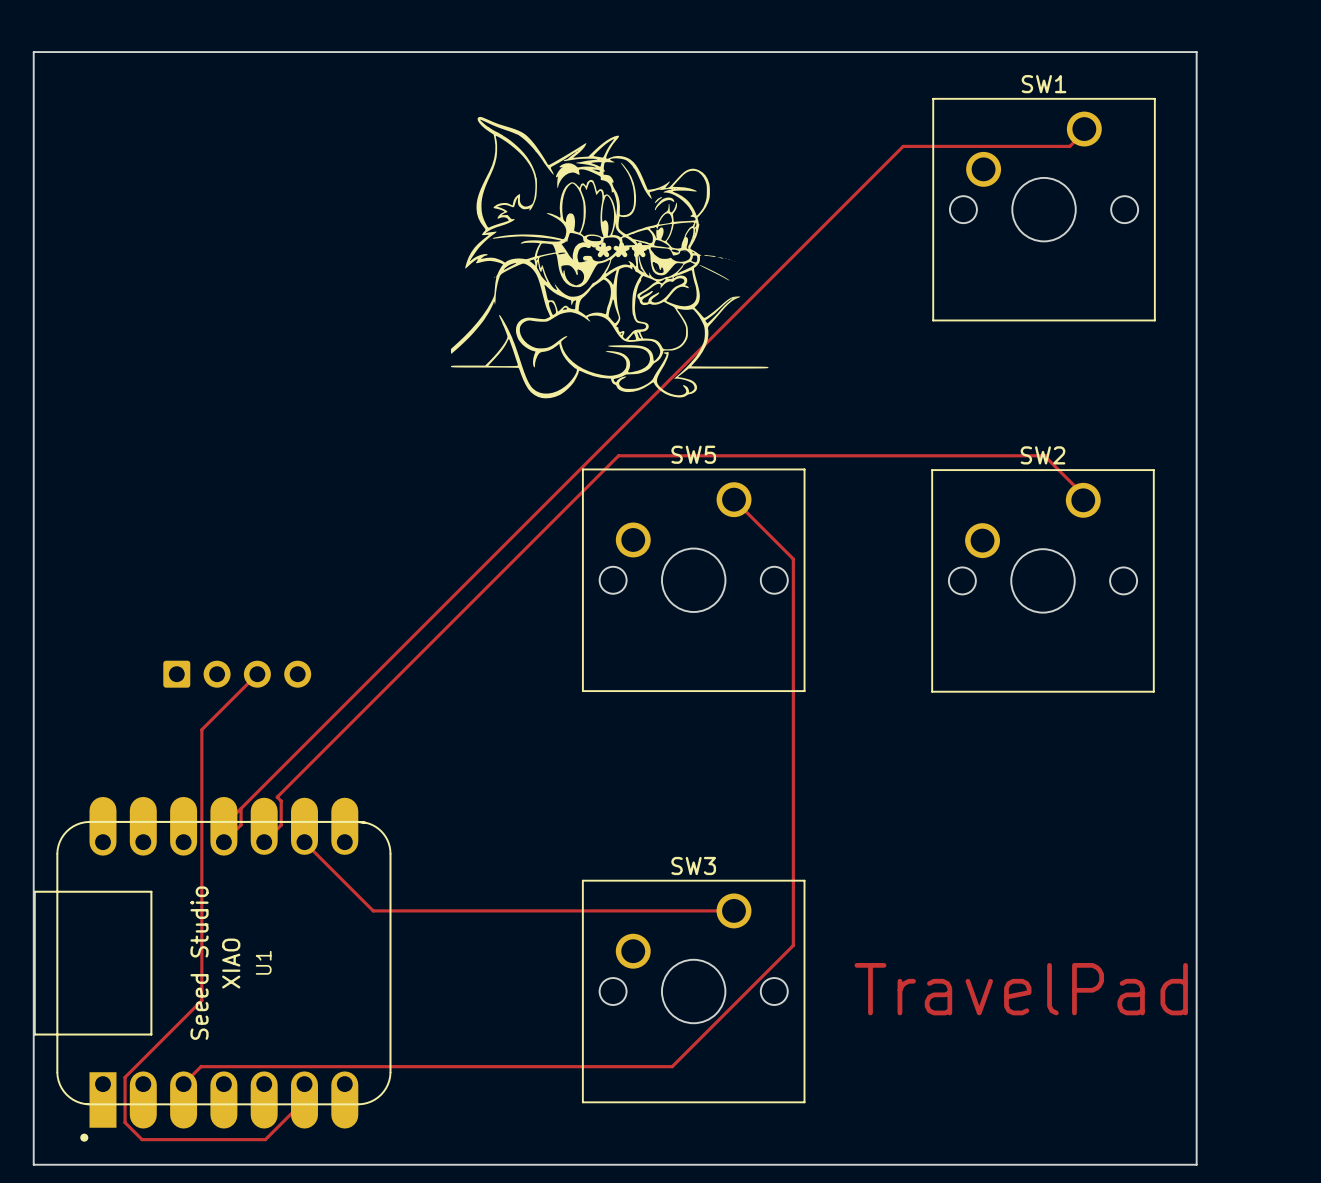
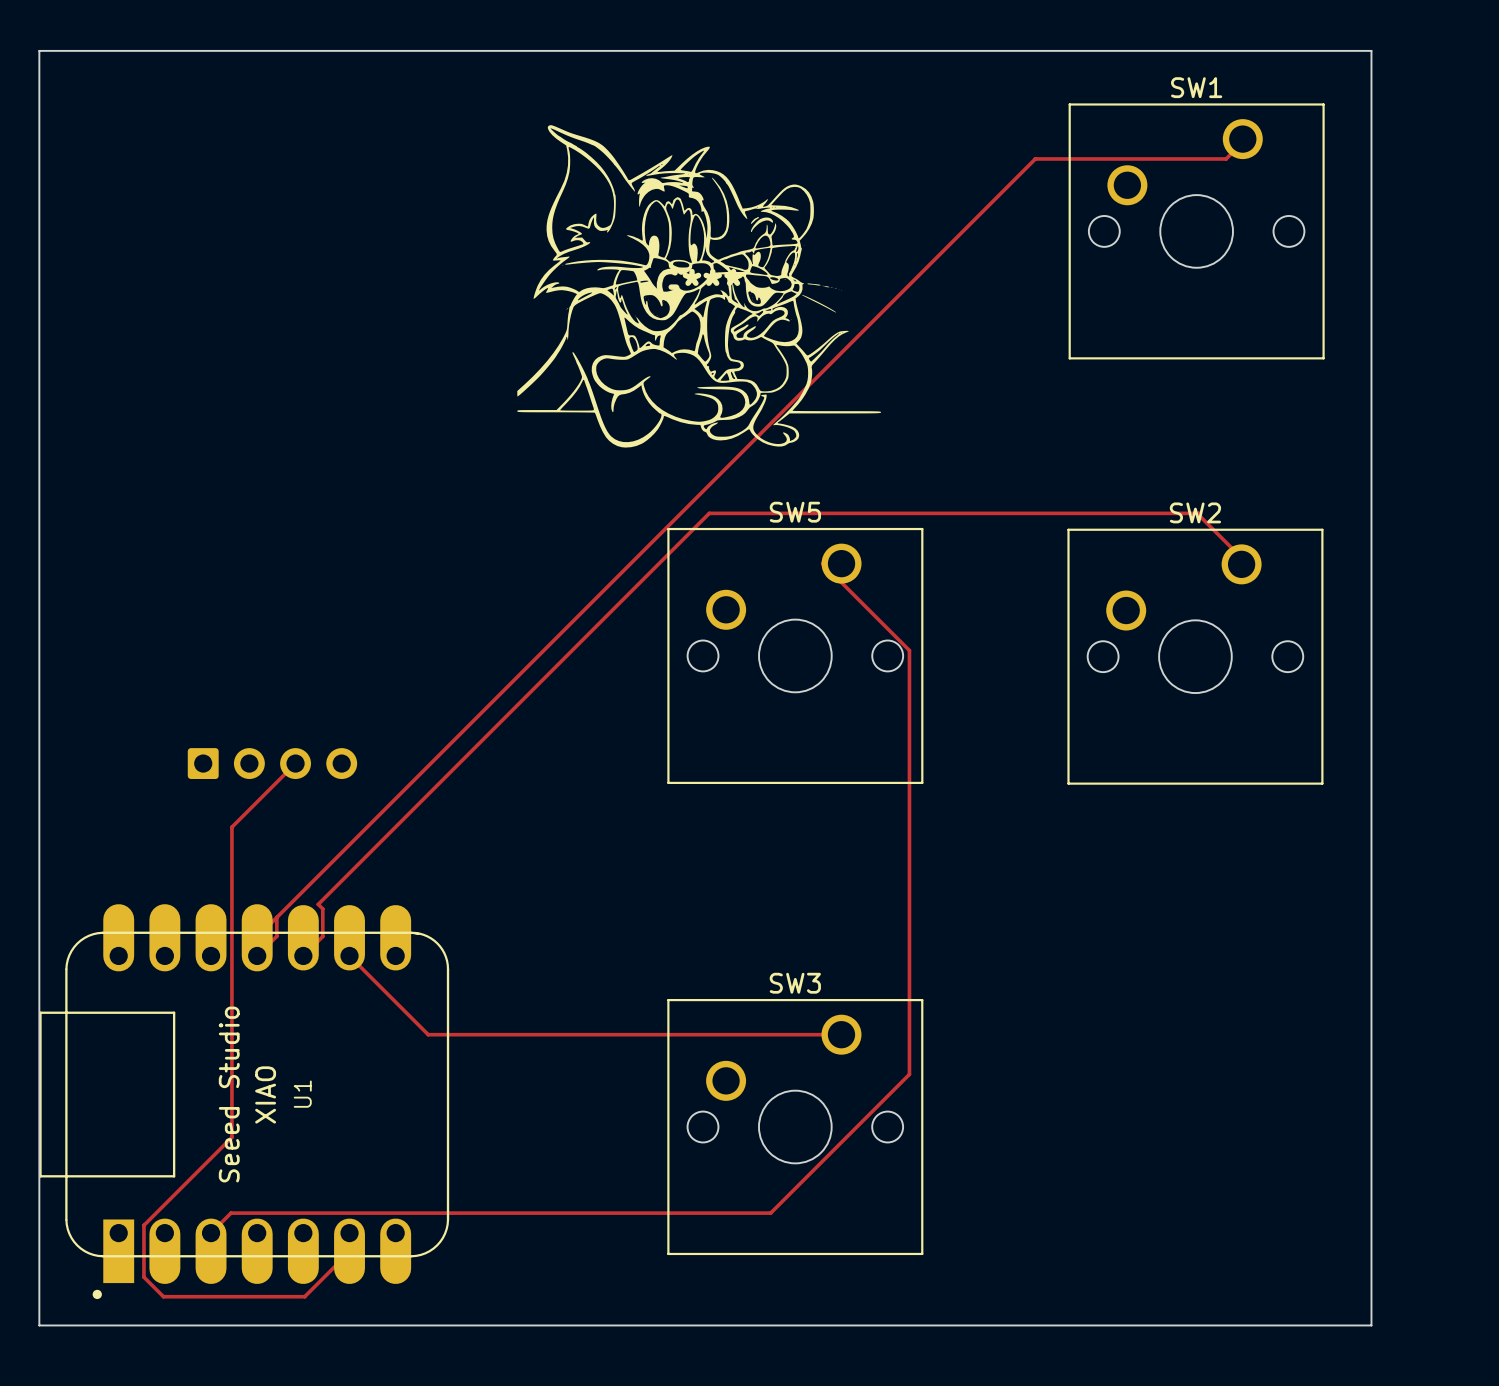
track: (734, 499) (793, 559) (793, 575) -> (822, 563) (909, 650)
text: TravelPad (1021, 989) -> none

